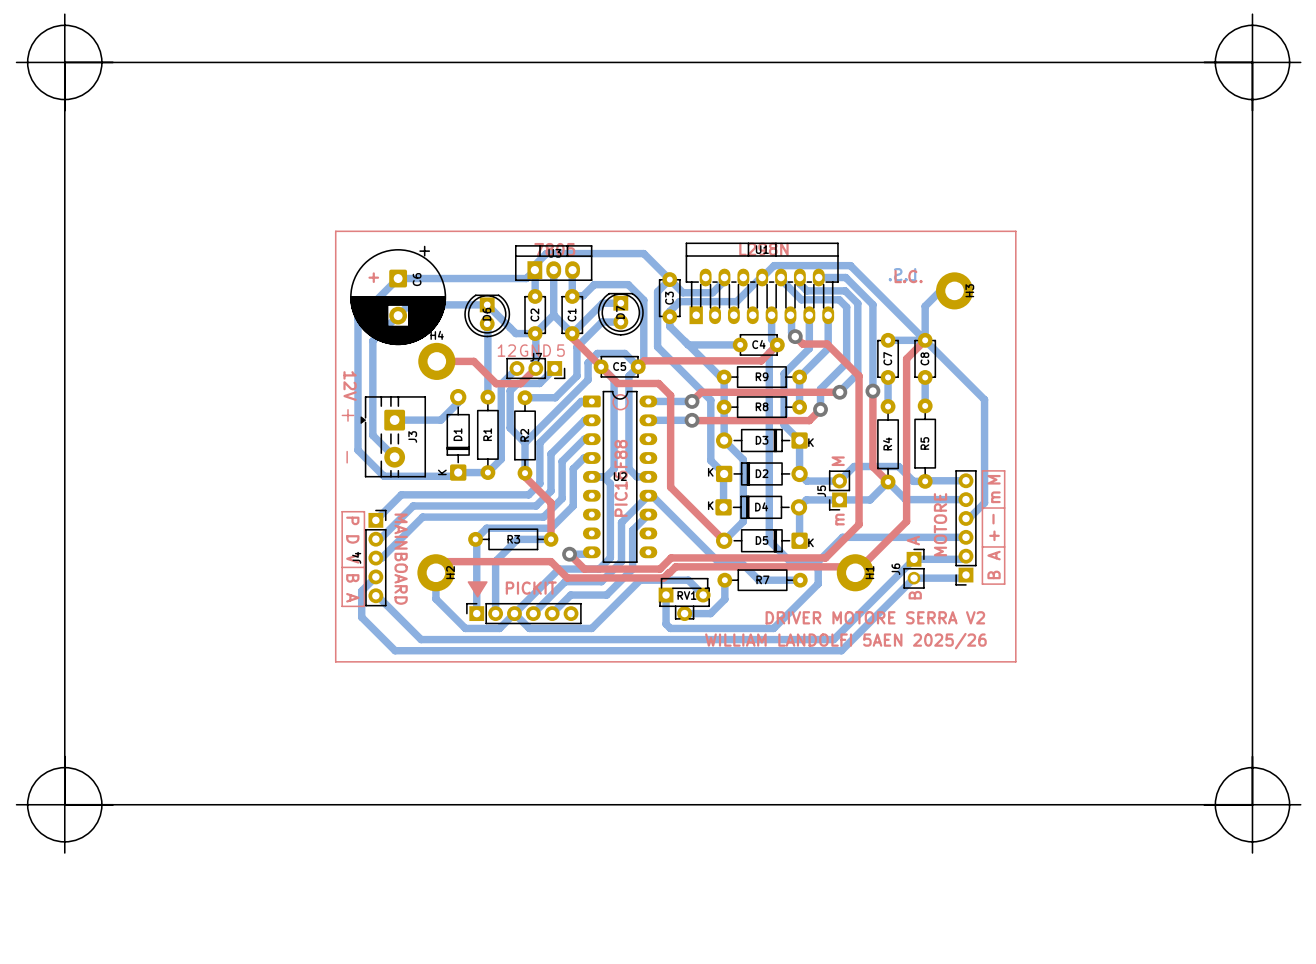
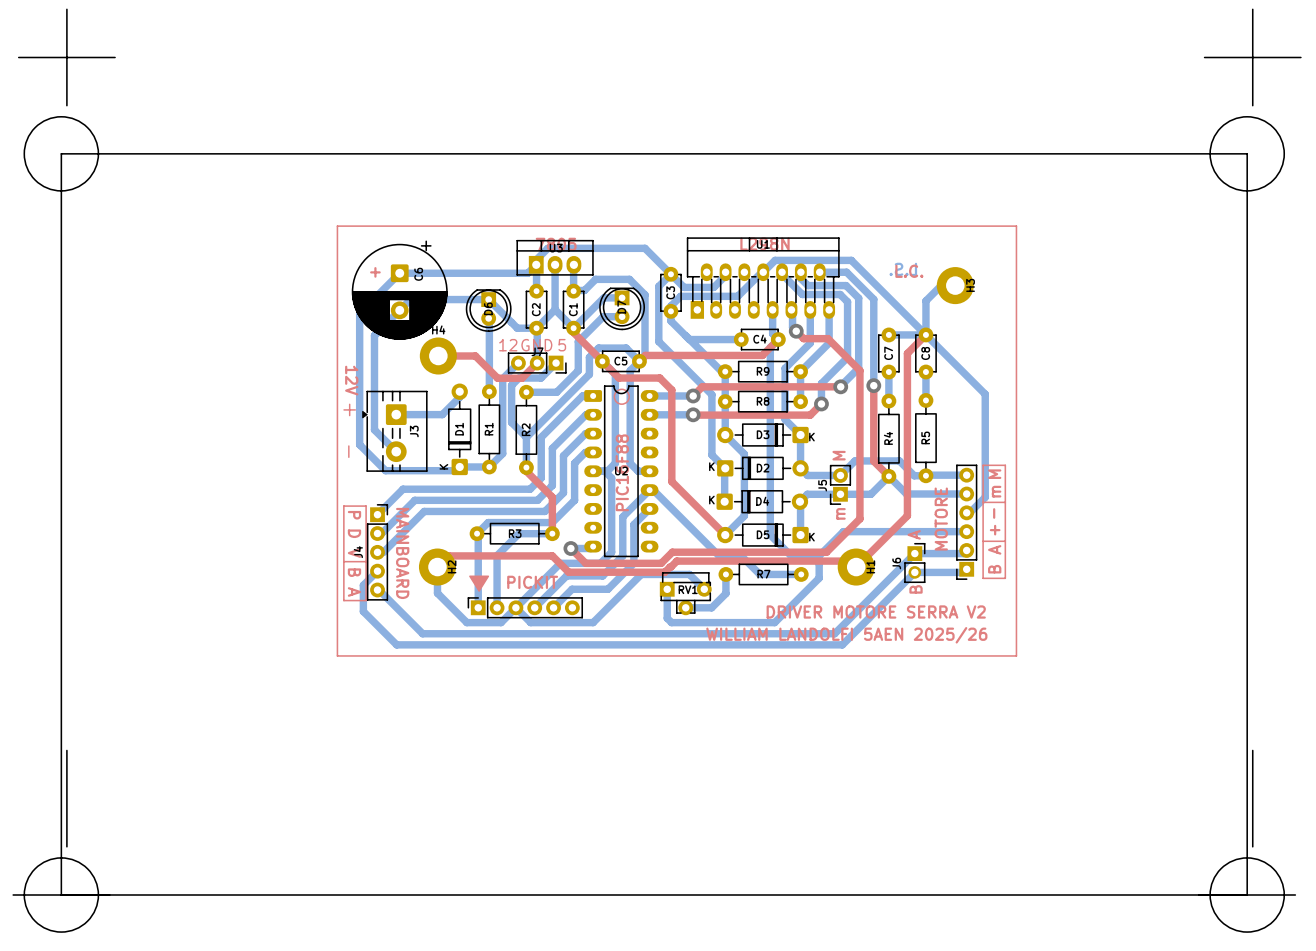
board edge: (64, 62) (1252, 62) (1252, 804) (64, 804) (64, 62) -> (61, 153) (1247, 153) (1247, 894) (61, 894) (61, 153)
round board edge position: (64, 62) -> (61, 153)
round board edge position: (1252, 62) -> (1247, 153)
board edge: (16, 804) (113, 804) -> (13, 894) (109, 894)
round board edge position: (64, 804) -> (61, 894)
board edge: (1204, 804) (1300, 804) -> (1199, 894) (1295, 894)
round board edge position: (1252, 804) -> (1247, 894)

